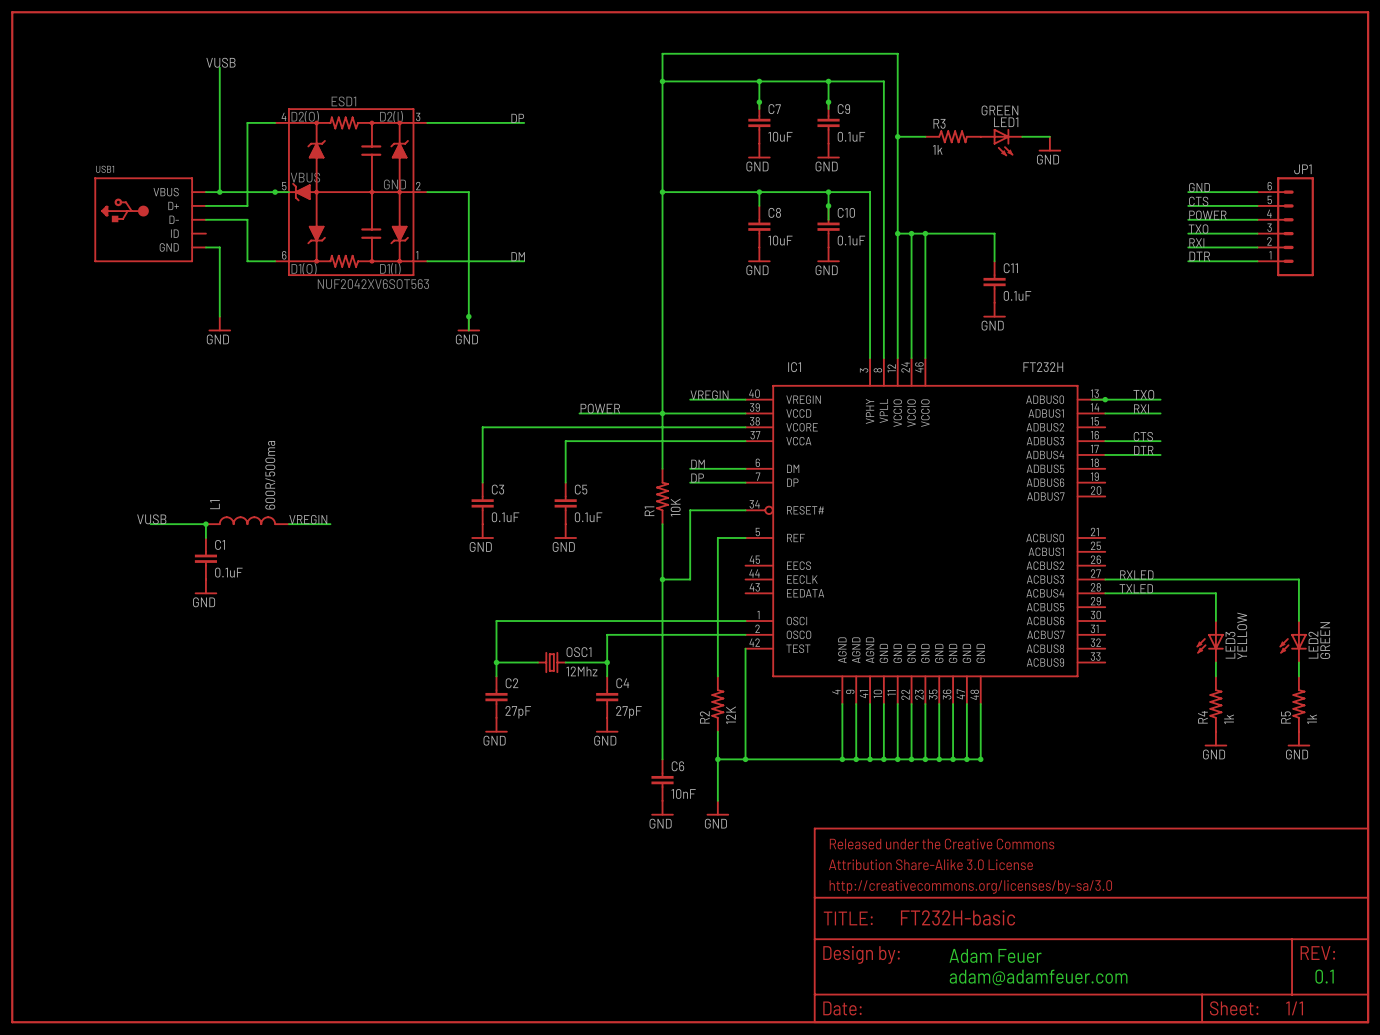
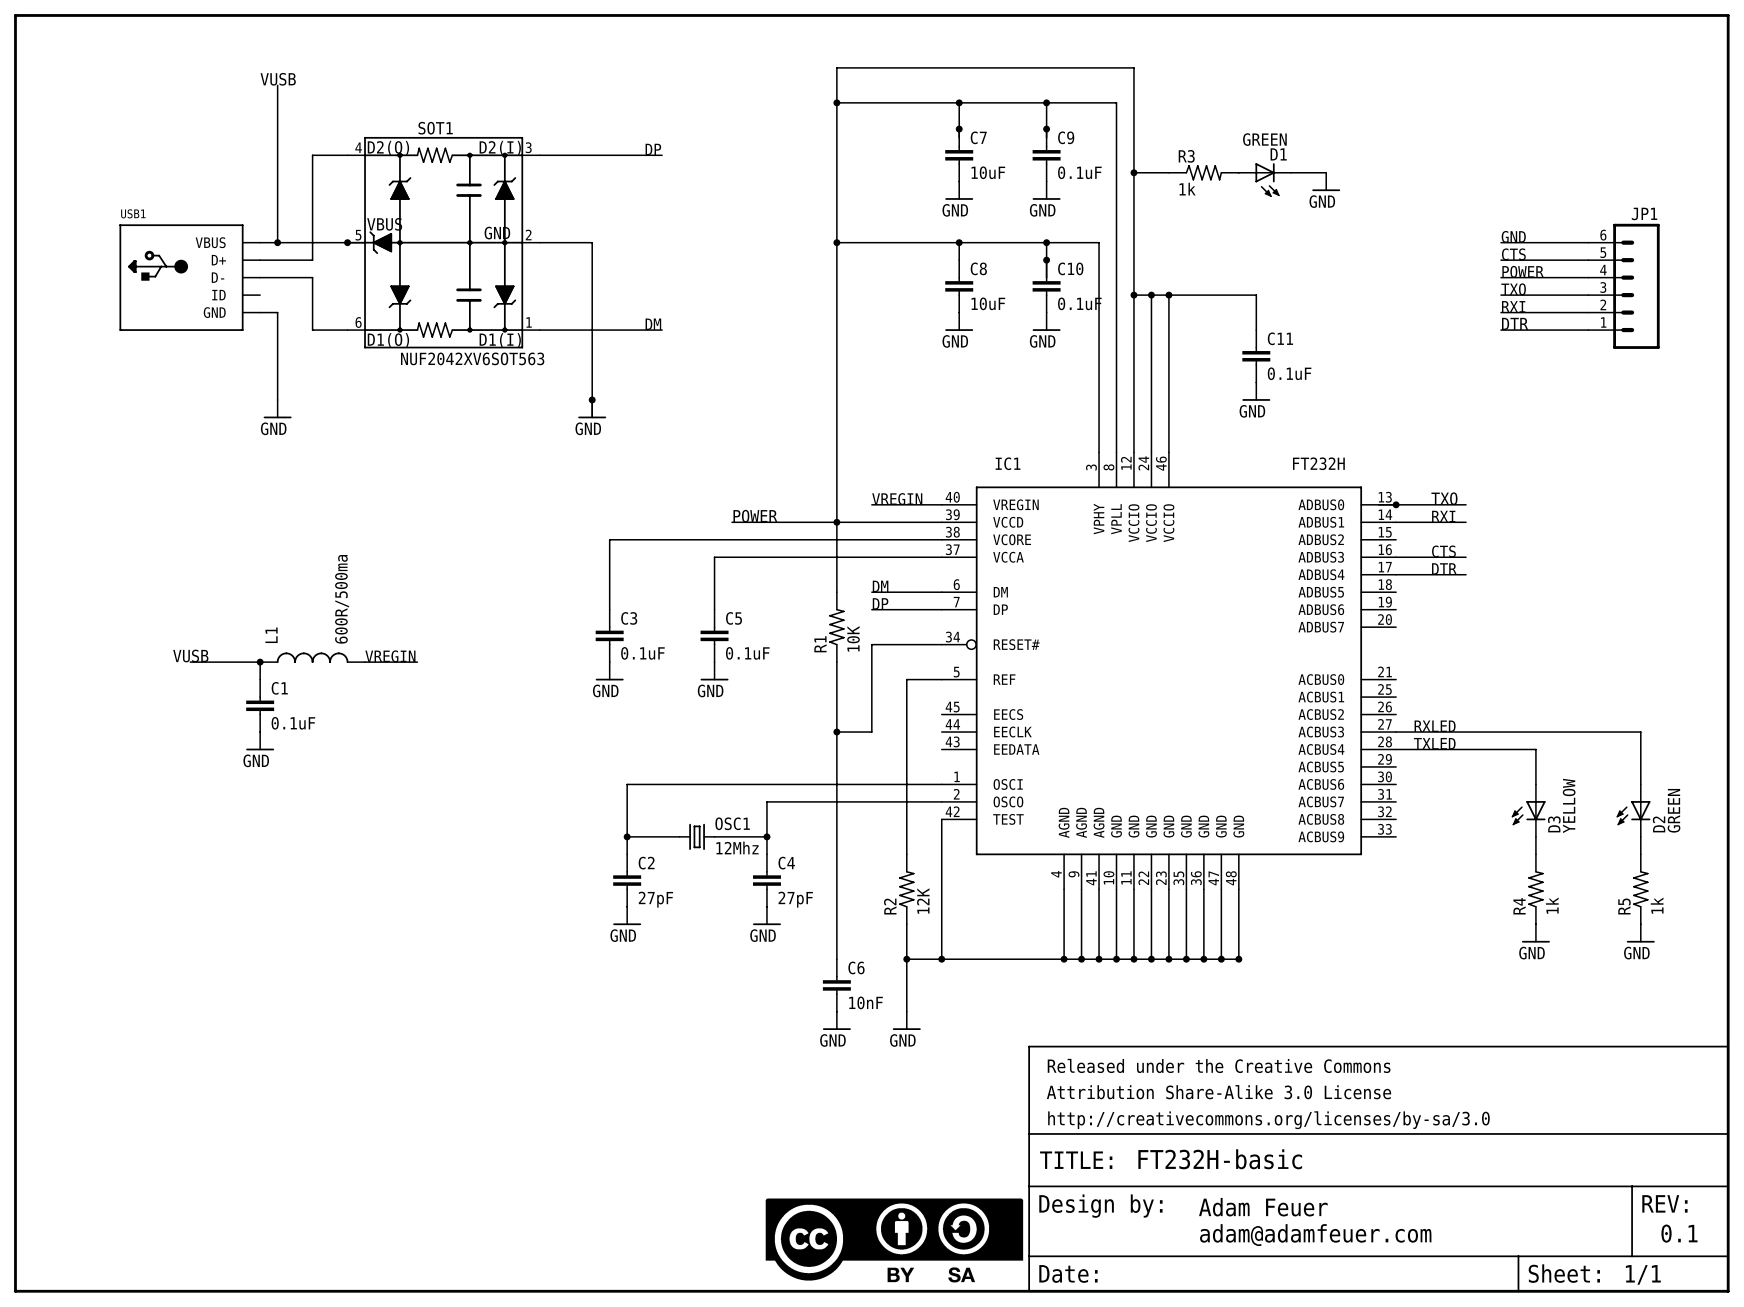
ESD1 name: ESD1 (343, 101) -> SOT1 (435, 128)
LED1 name: LED1 (1006, 122) -> D1 (1278, 154)
LED3 name: LED3 (1230, 645) -> D3 (1554, 824)
LED2 name: LED2 (1313, 645) -> D2 (1659, 824)
part: none -> (894, 1240)

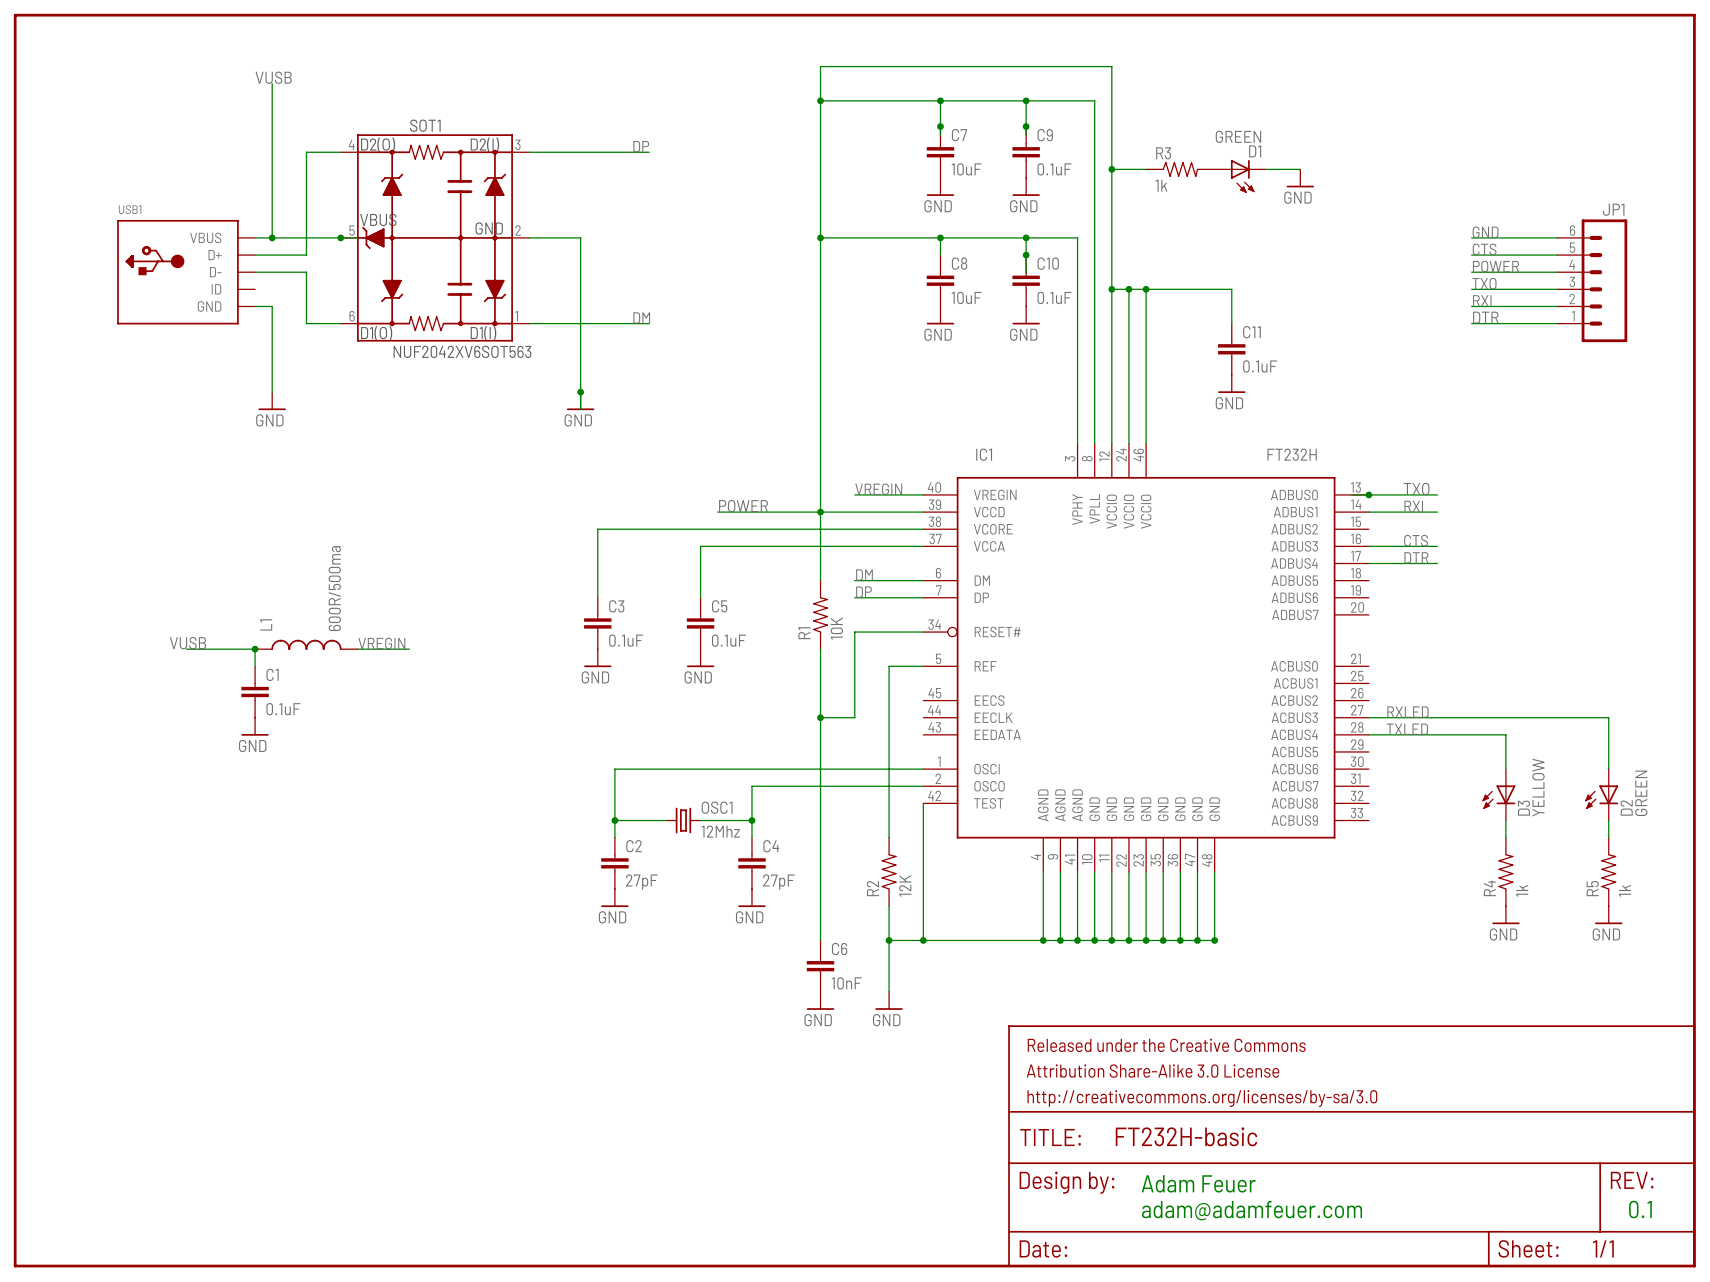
text position: Adam Feuer (1263, 1207) -> Adam Feuer (1198, 1183)
text position: adam@adamfeuer.com (1315, 1235) -> adam@adamfeuer.com (1252, 1210)
part: (894, 1240) -> none

